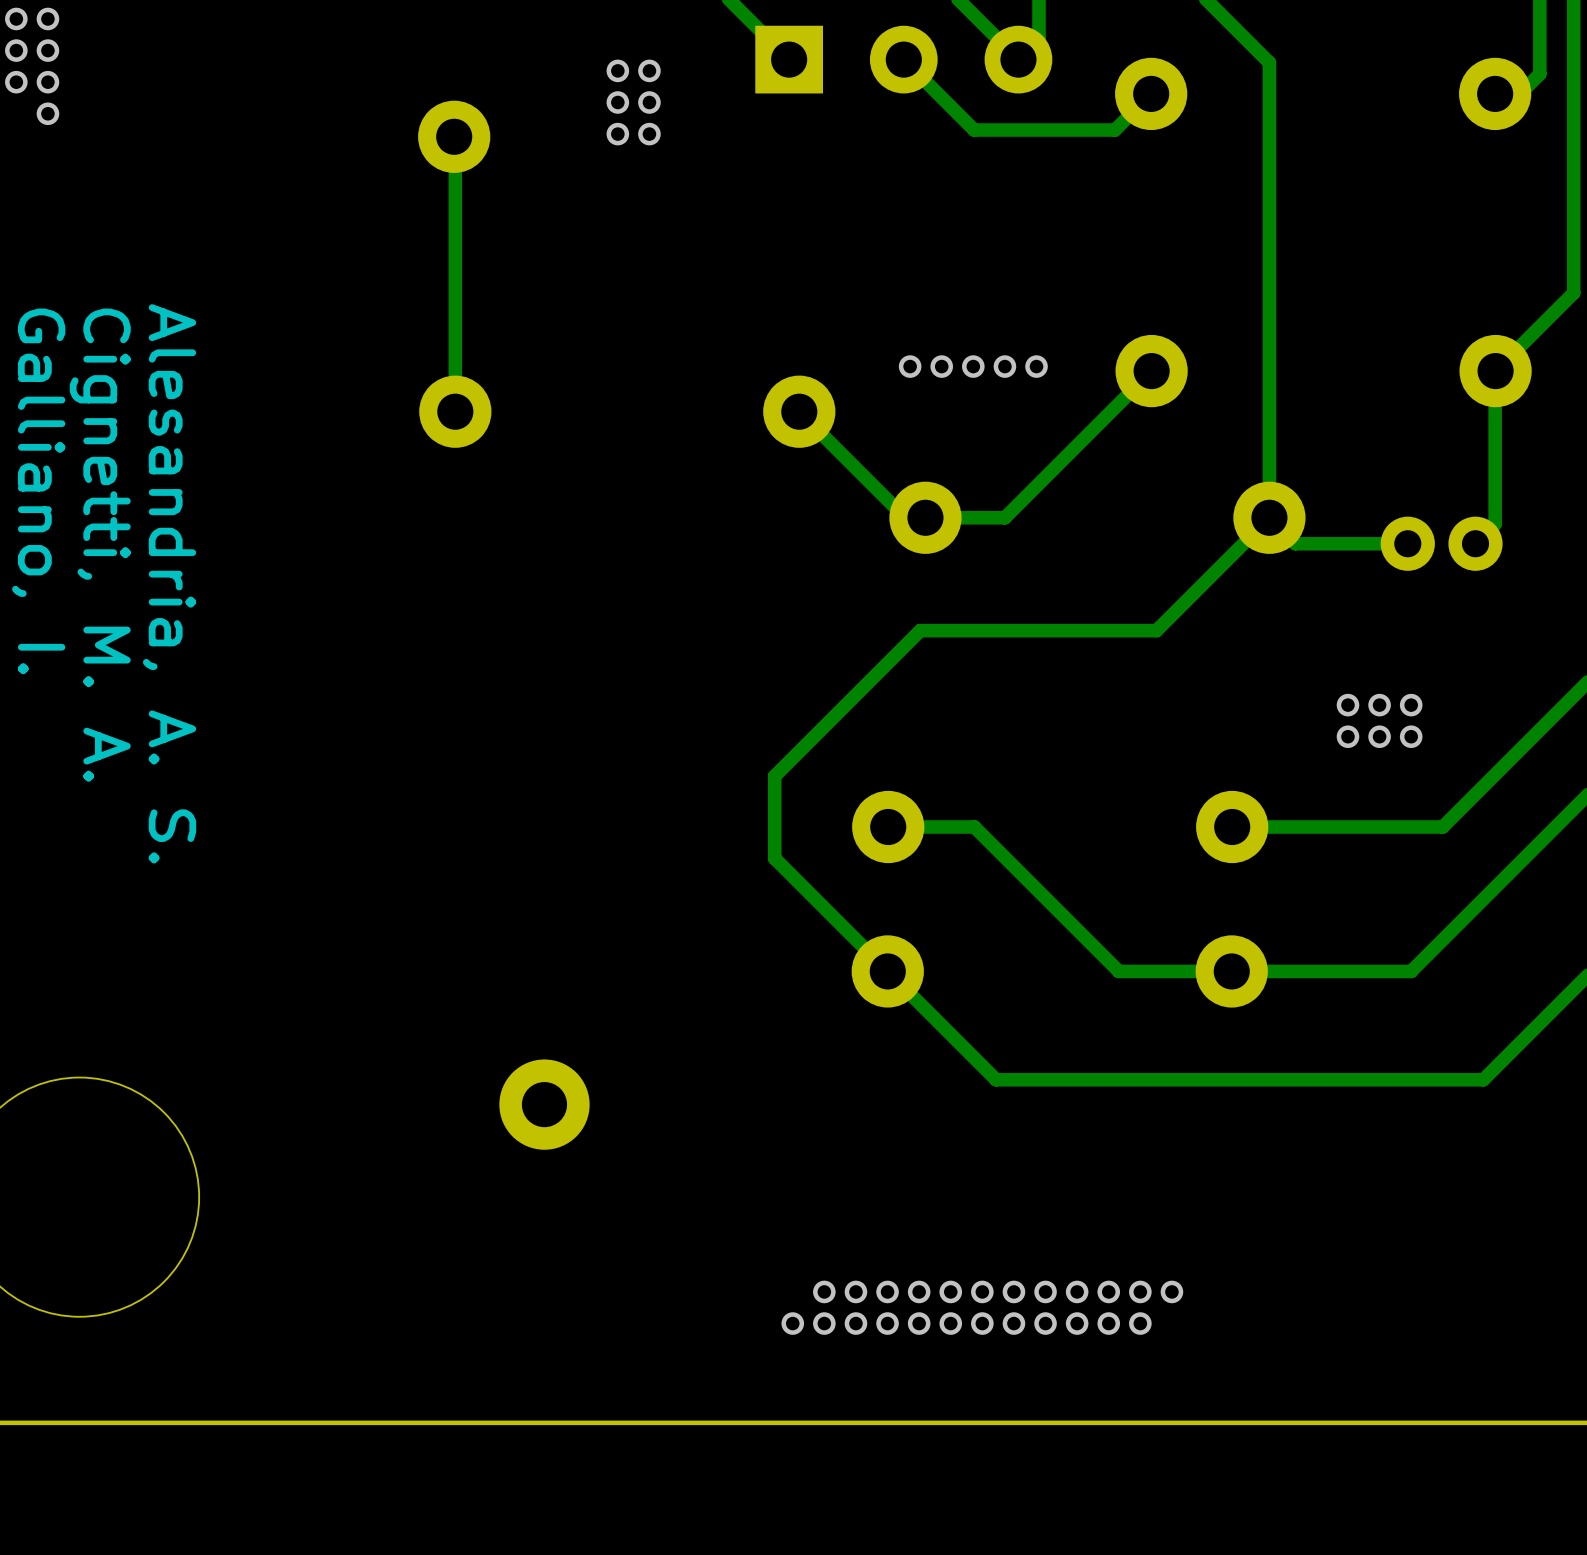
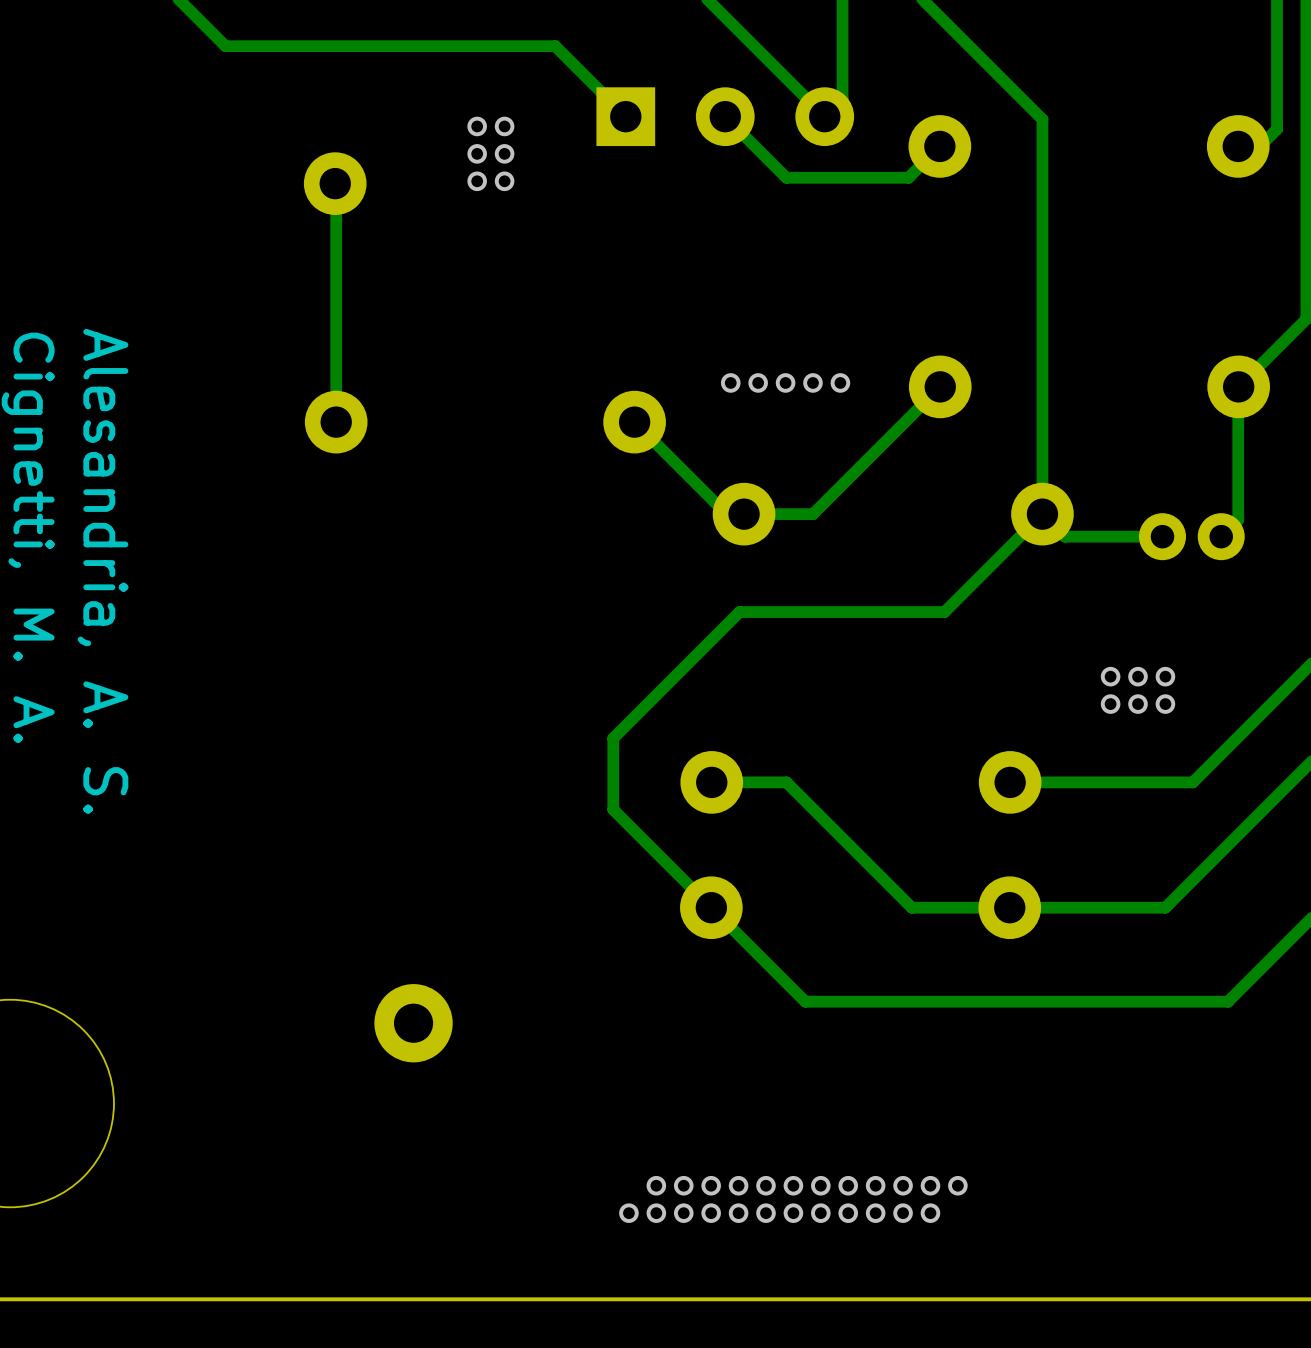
text position: Alesandria, A. S. (169, 583) -> Alesandria, A. S. (103, 571)

